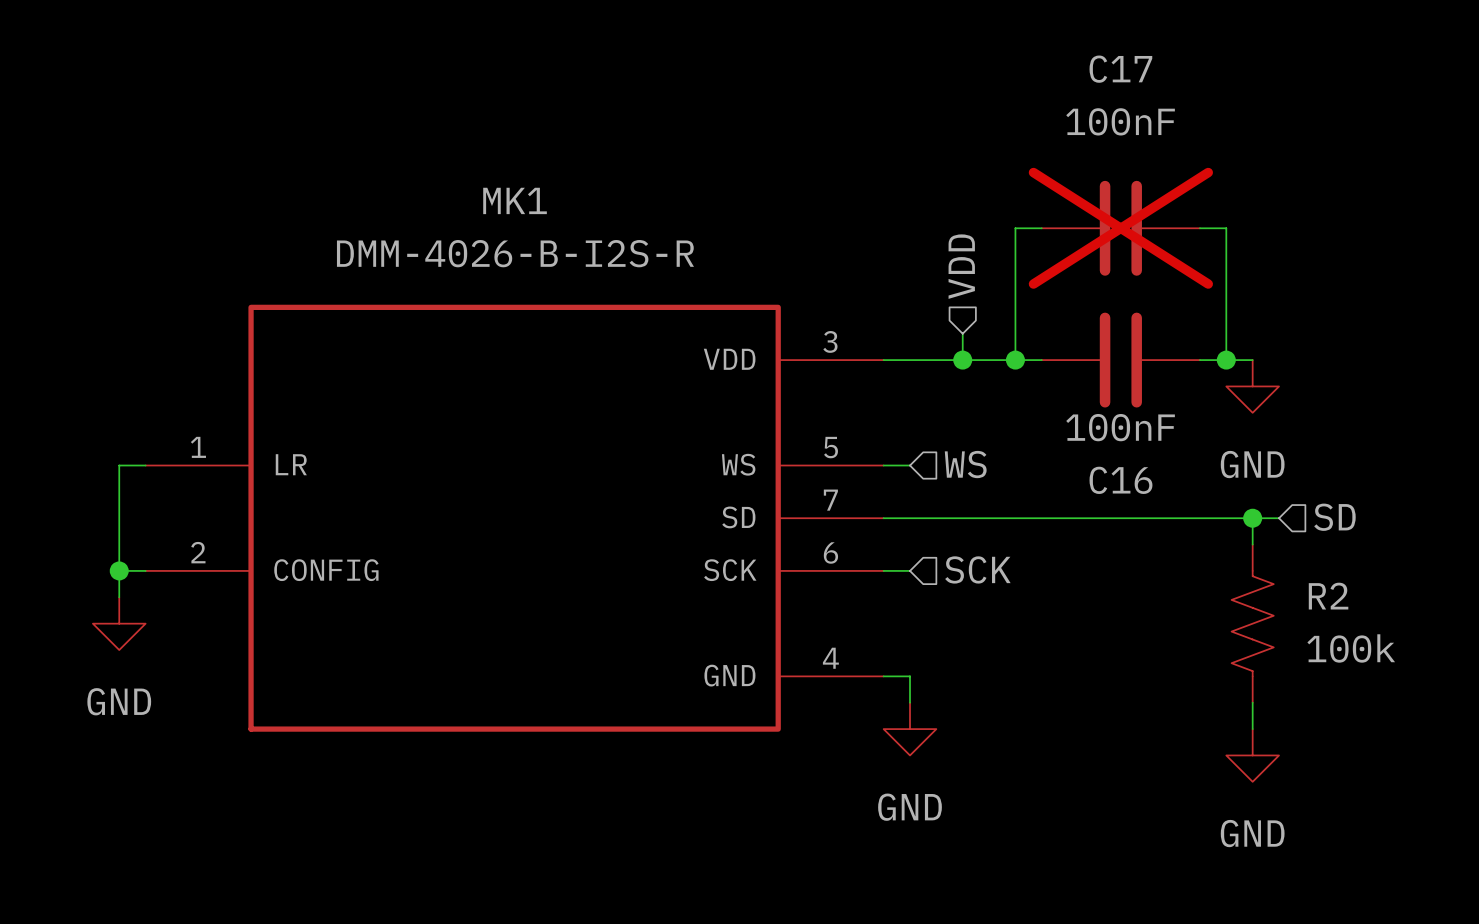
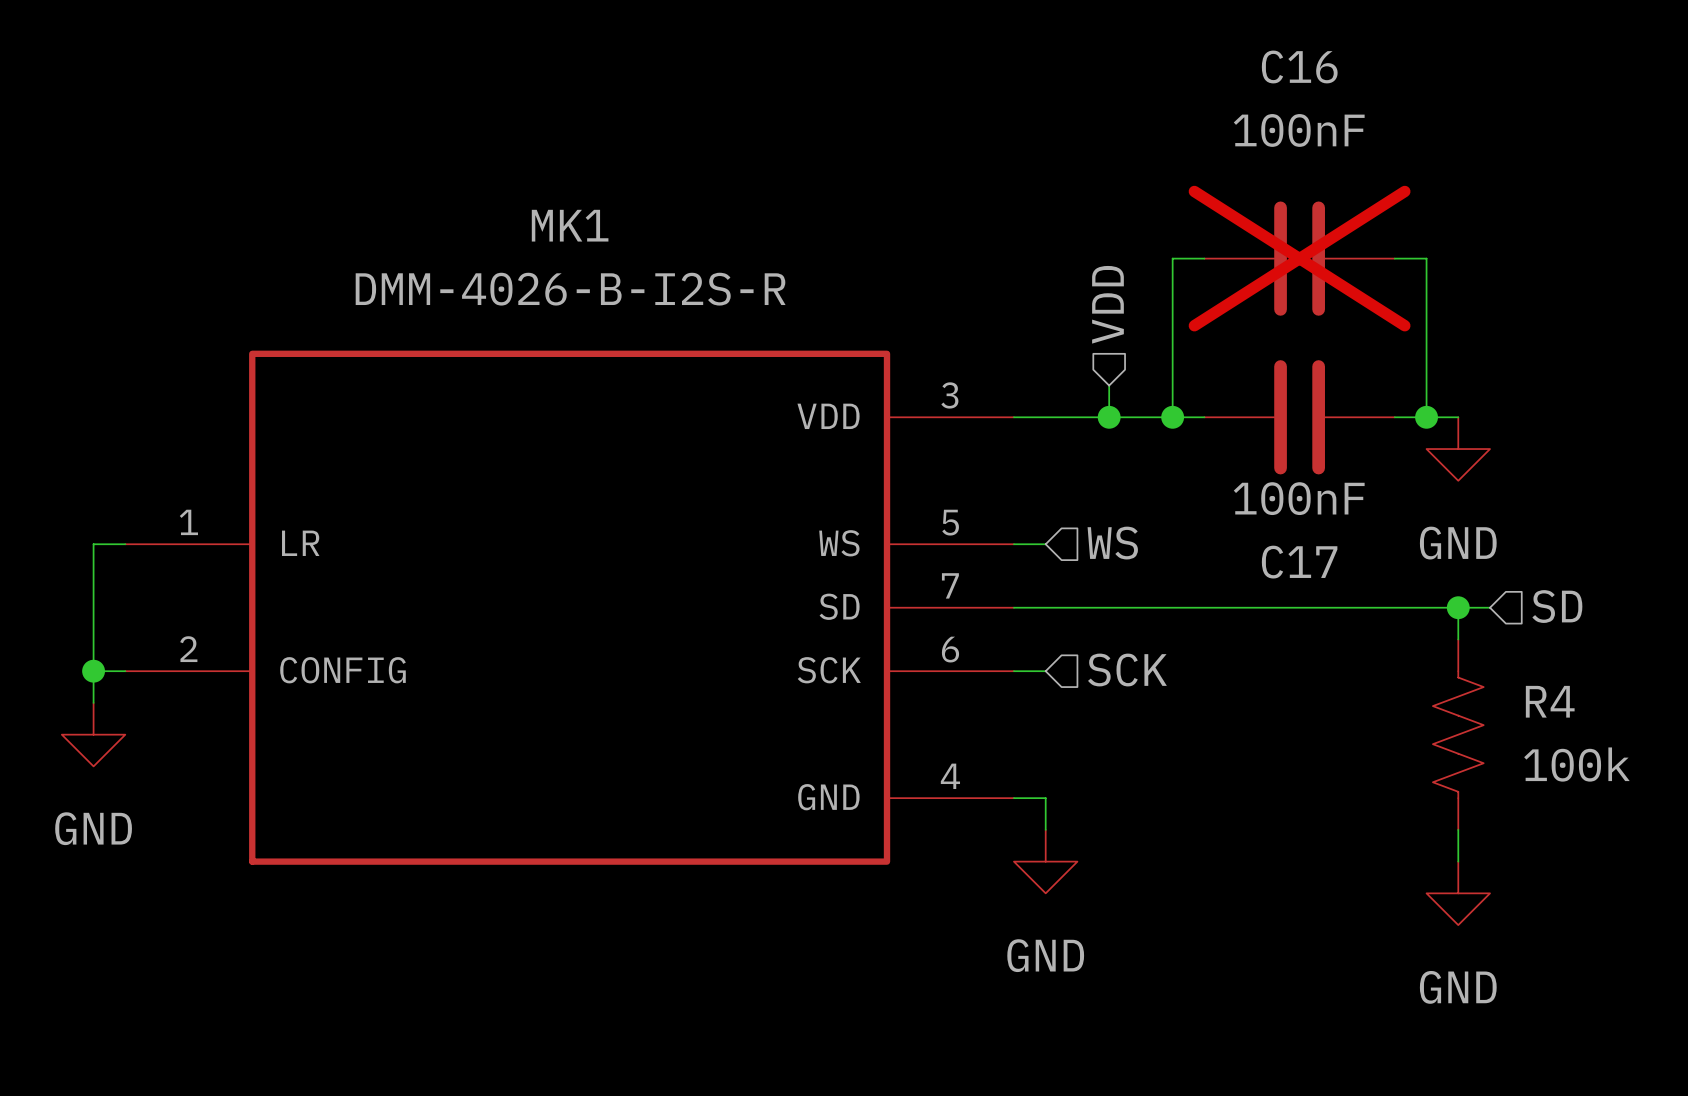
C17 name: C17 (1120, 69) -> C16 (1299, 66)
C16 name: C16 (1120, 480) -> C17 (1299, 562)
R2 name: R2 (1328, 596) -> R4 (1550, 701)

